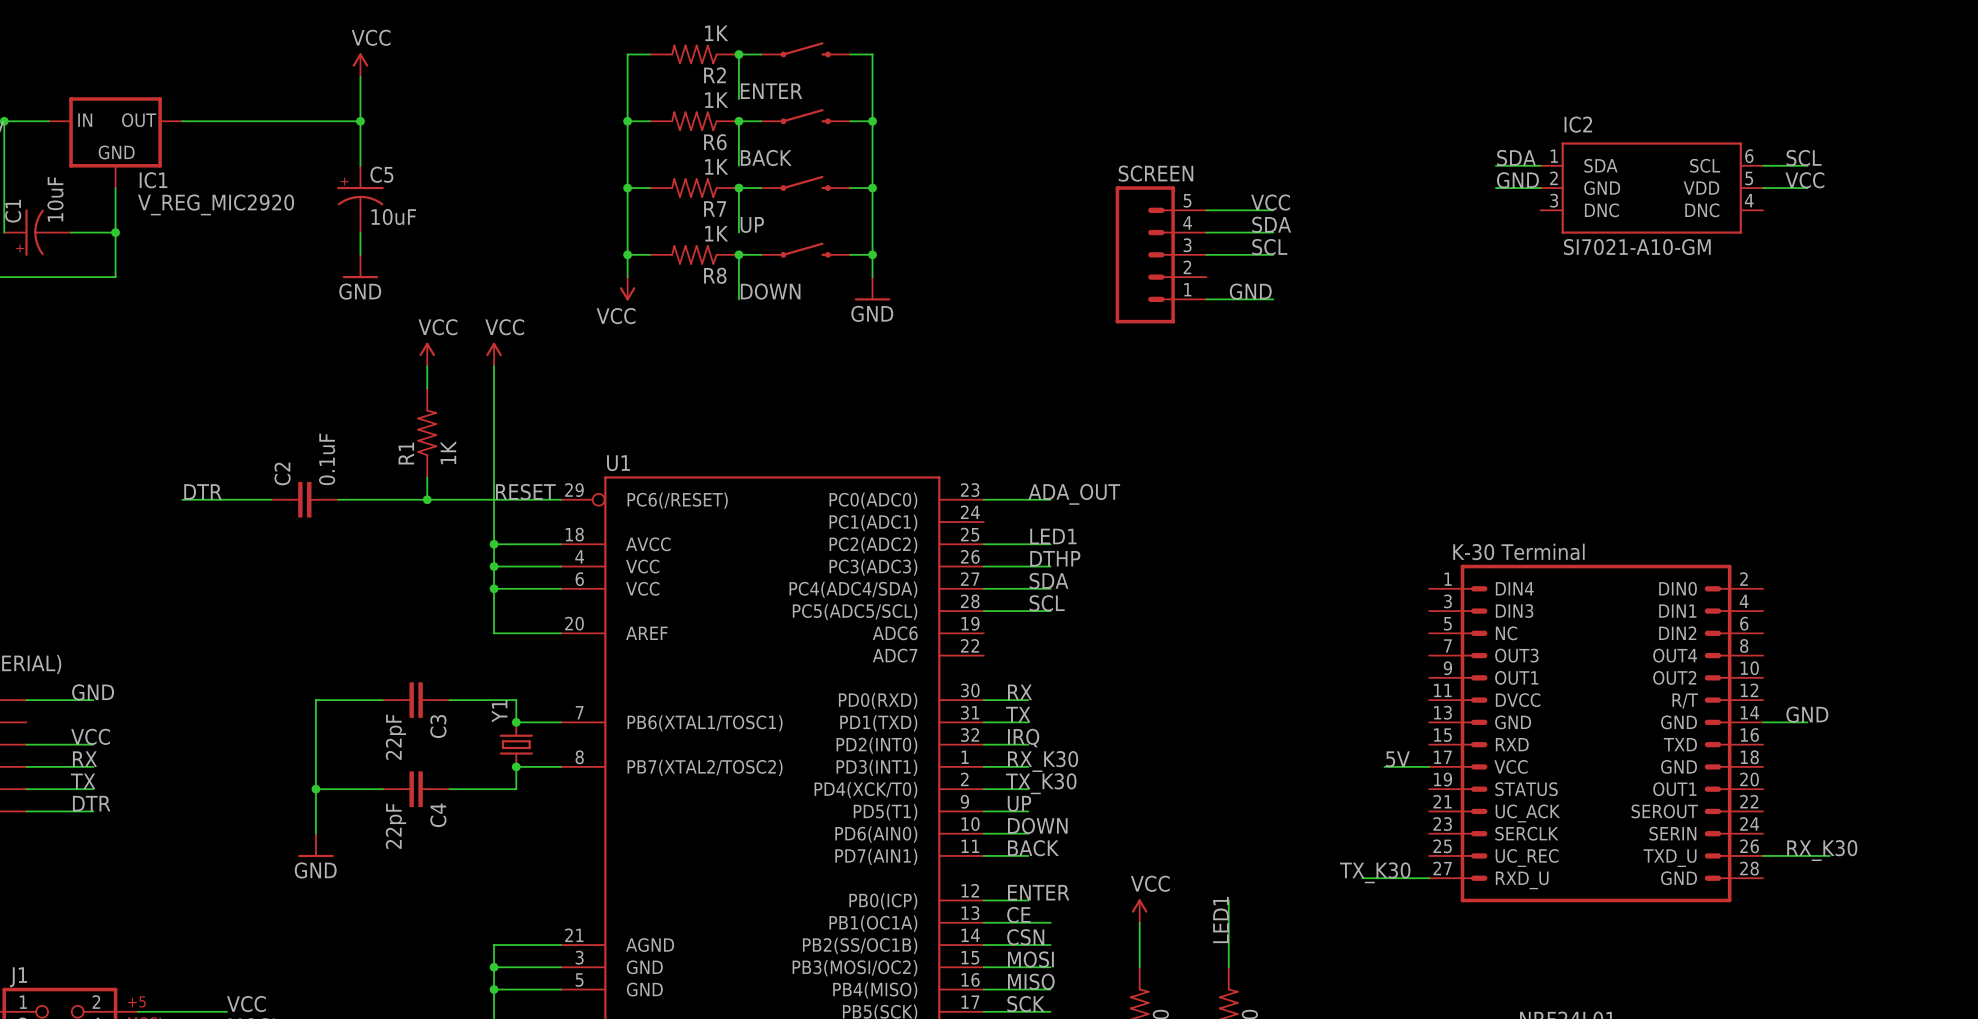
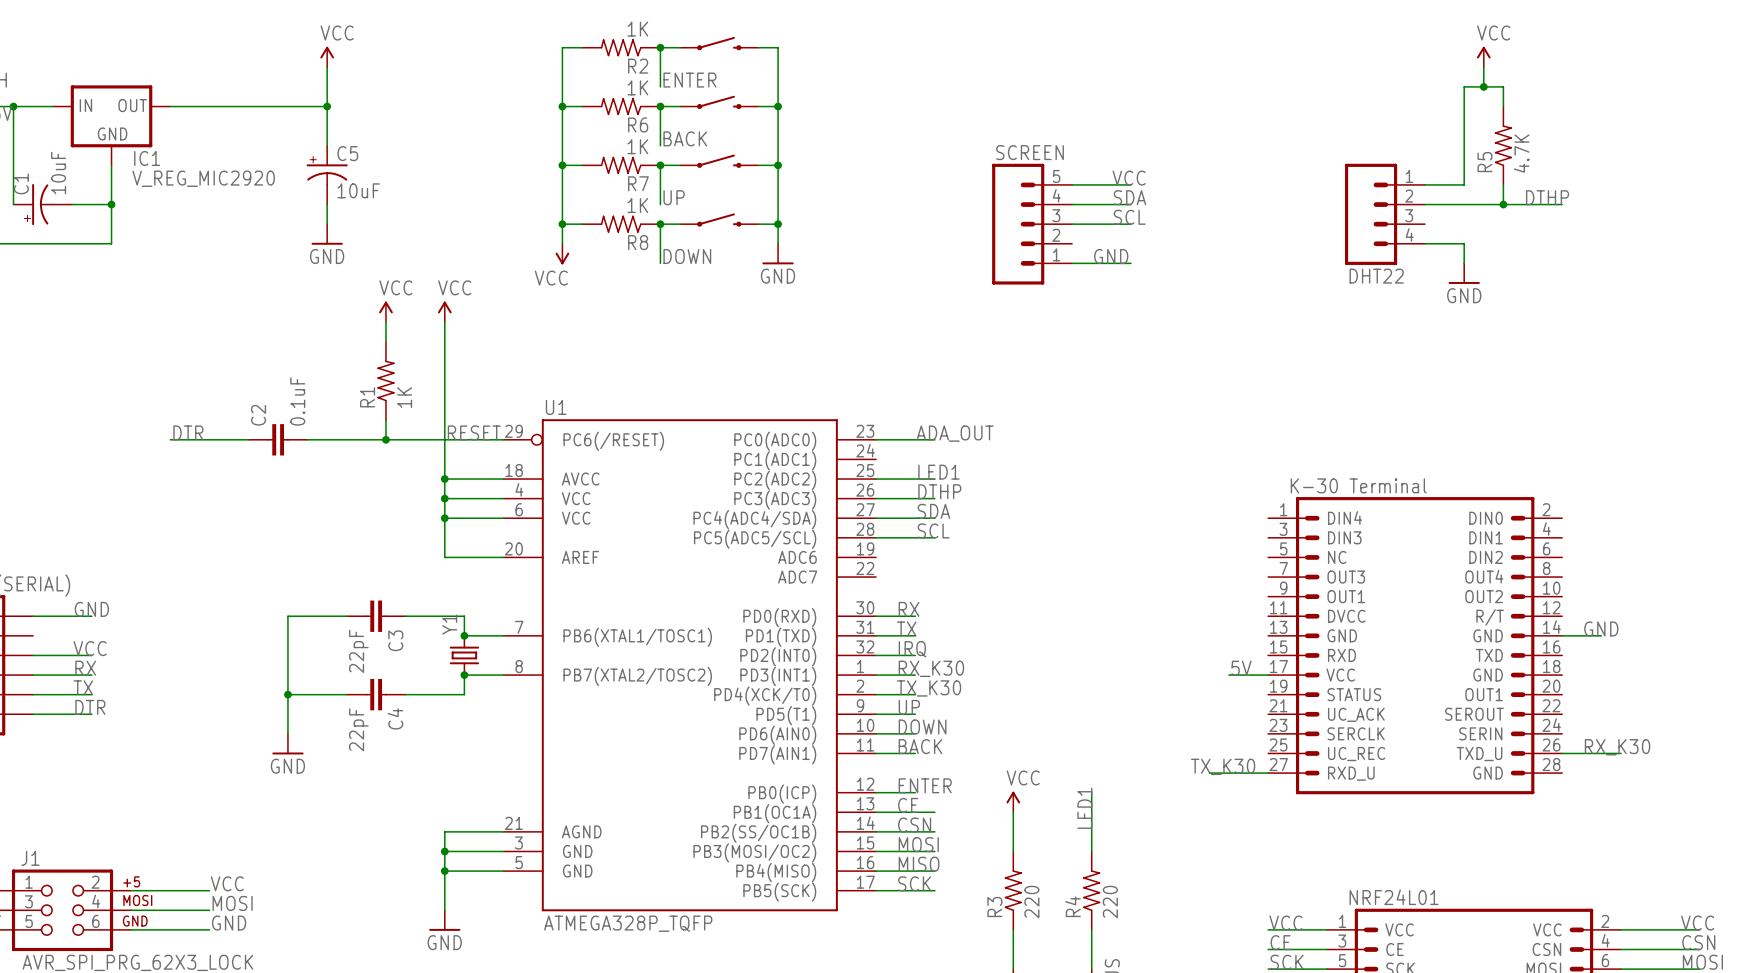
power symbol: none -> VCC (1483, 57)
wire: none -> (1483, 67) (1483, 86)
junction: none -> (1483, 86)
wire: none -> (1503, 106) (1503, 86) (1464, 86) (1464, 184) (1424, 184)
label: SDA (1516, 158) -> none
label: SCL (1804, 158) -> none
wire: (1495, 165) (1540, 165) -> none
R5: none -> 4.7K (1503, 145)
wire: (1763, 165) (1807, 165) -> none
label: GND (1517, 180) -> none
label: VCC (1804, 180) -> none
IC2: SI7021-A10-GM (1651, 188) -> none
wire: (1763, 188) (1807, 188) -> none
wire: none -> (1503, 184) (1503, 204)
label: none -> DTHP (1547, 197)
junction: none -> (1503, 204)
DHT22: none -> (1384, 214)
wire: none -> (1424, 243) (1464, 243) (1464, 263)
power symbol: none -> GND (1464, 273)

